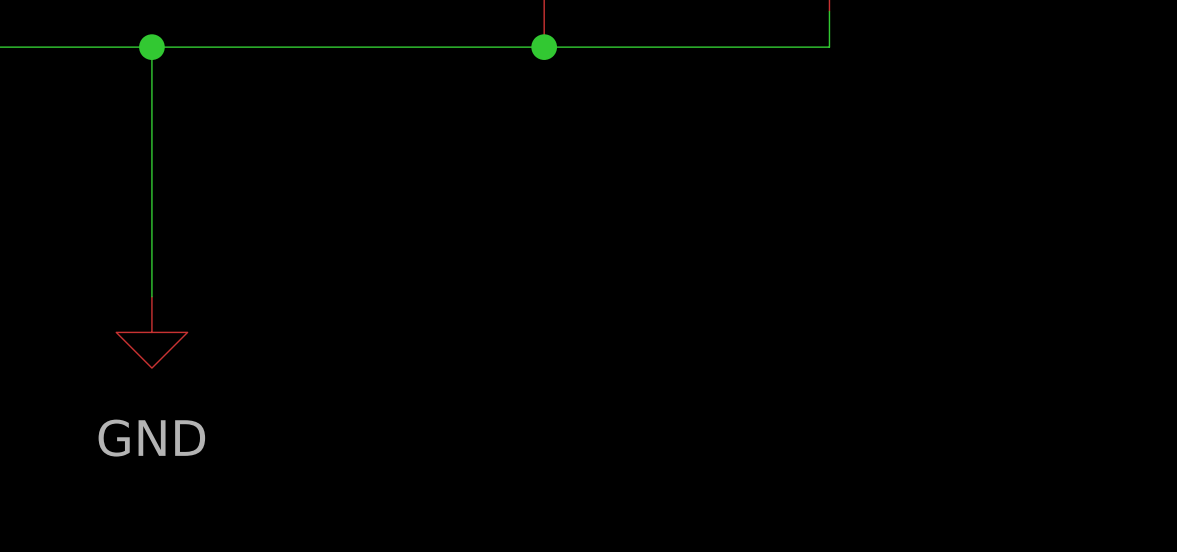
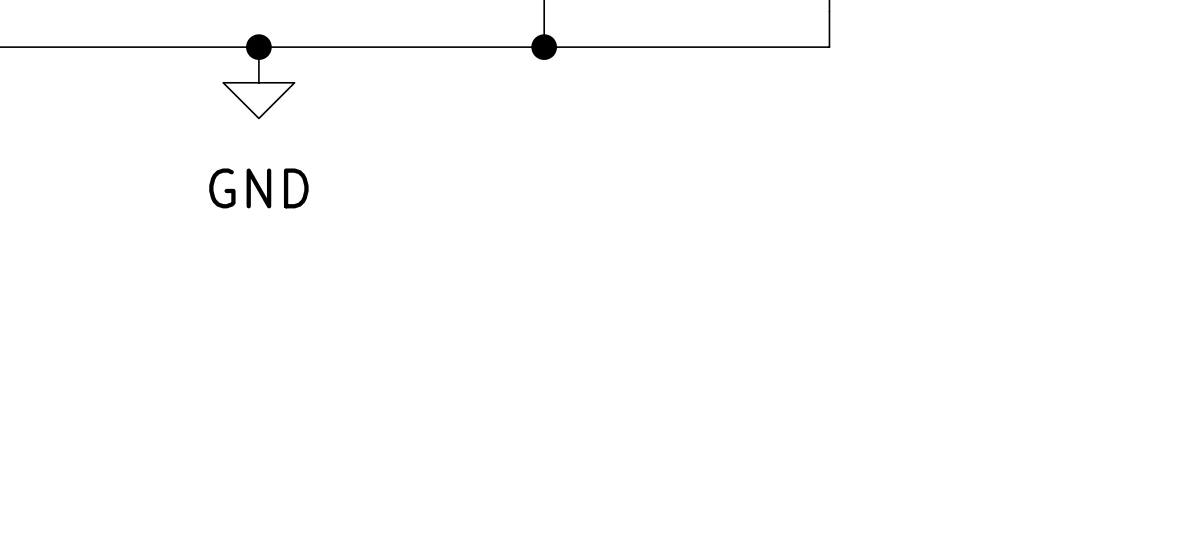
wire: (151, 47) (151, 296) -> none
junction position: (151, 47) -> (258, 47)
power symbol position: GND (151, 332) -> GND (258, 82)

